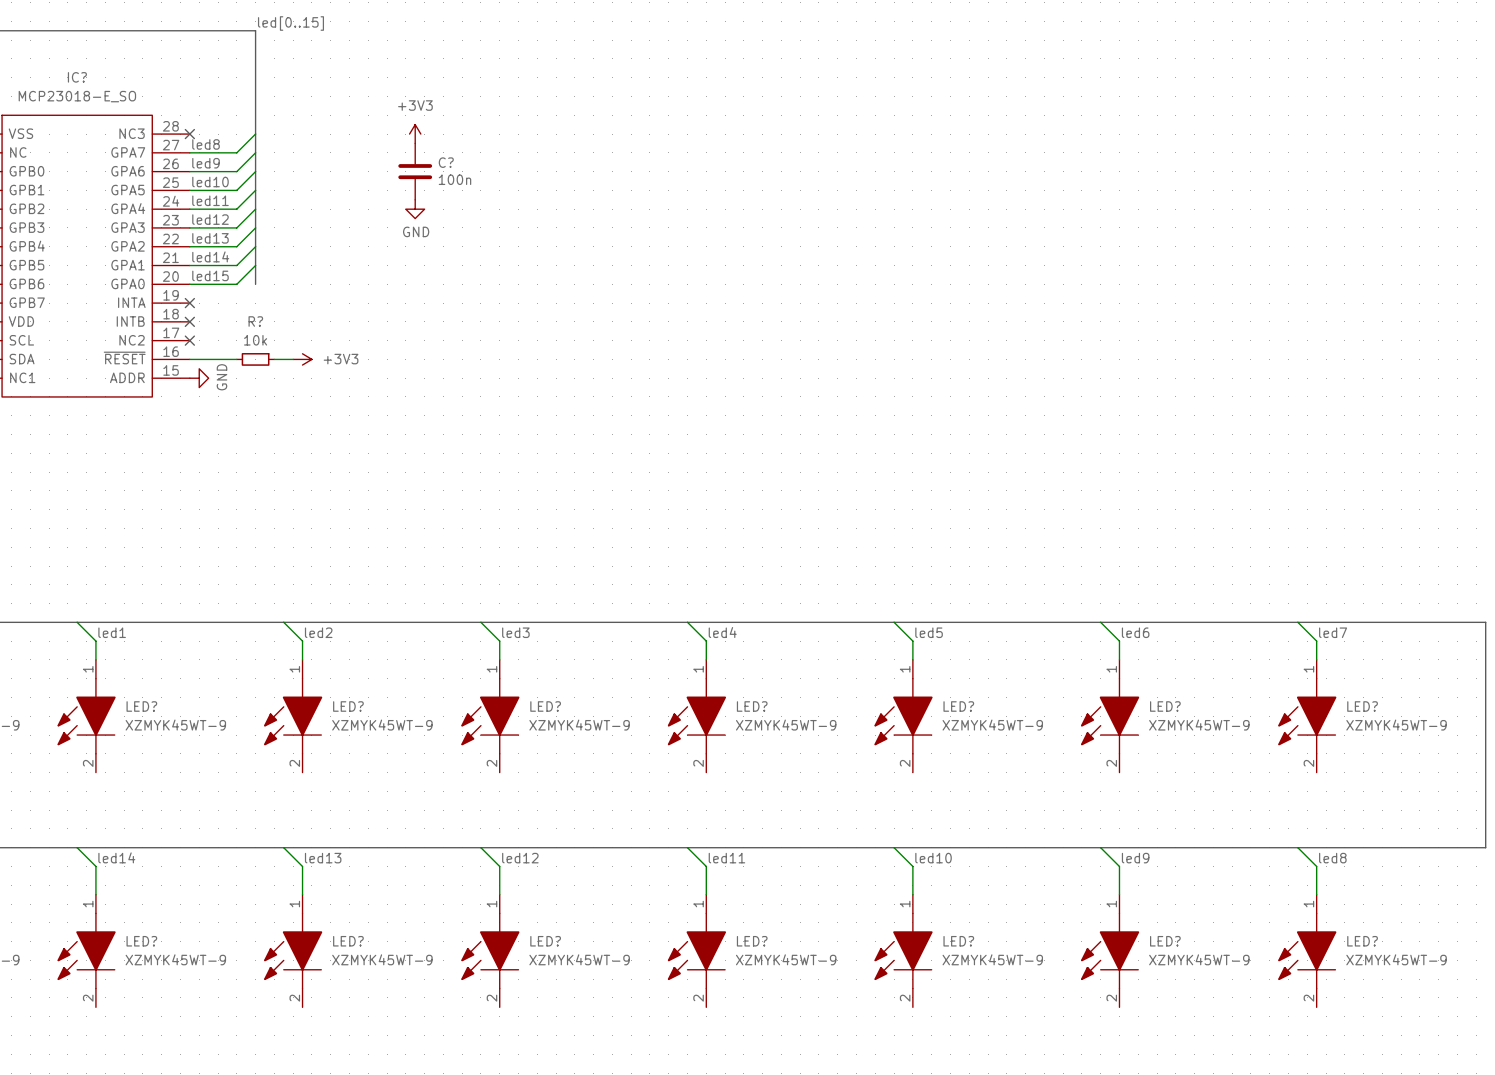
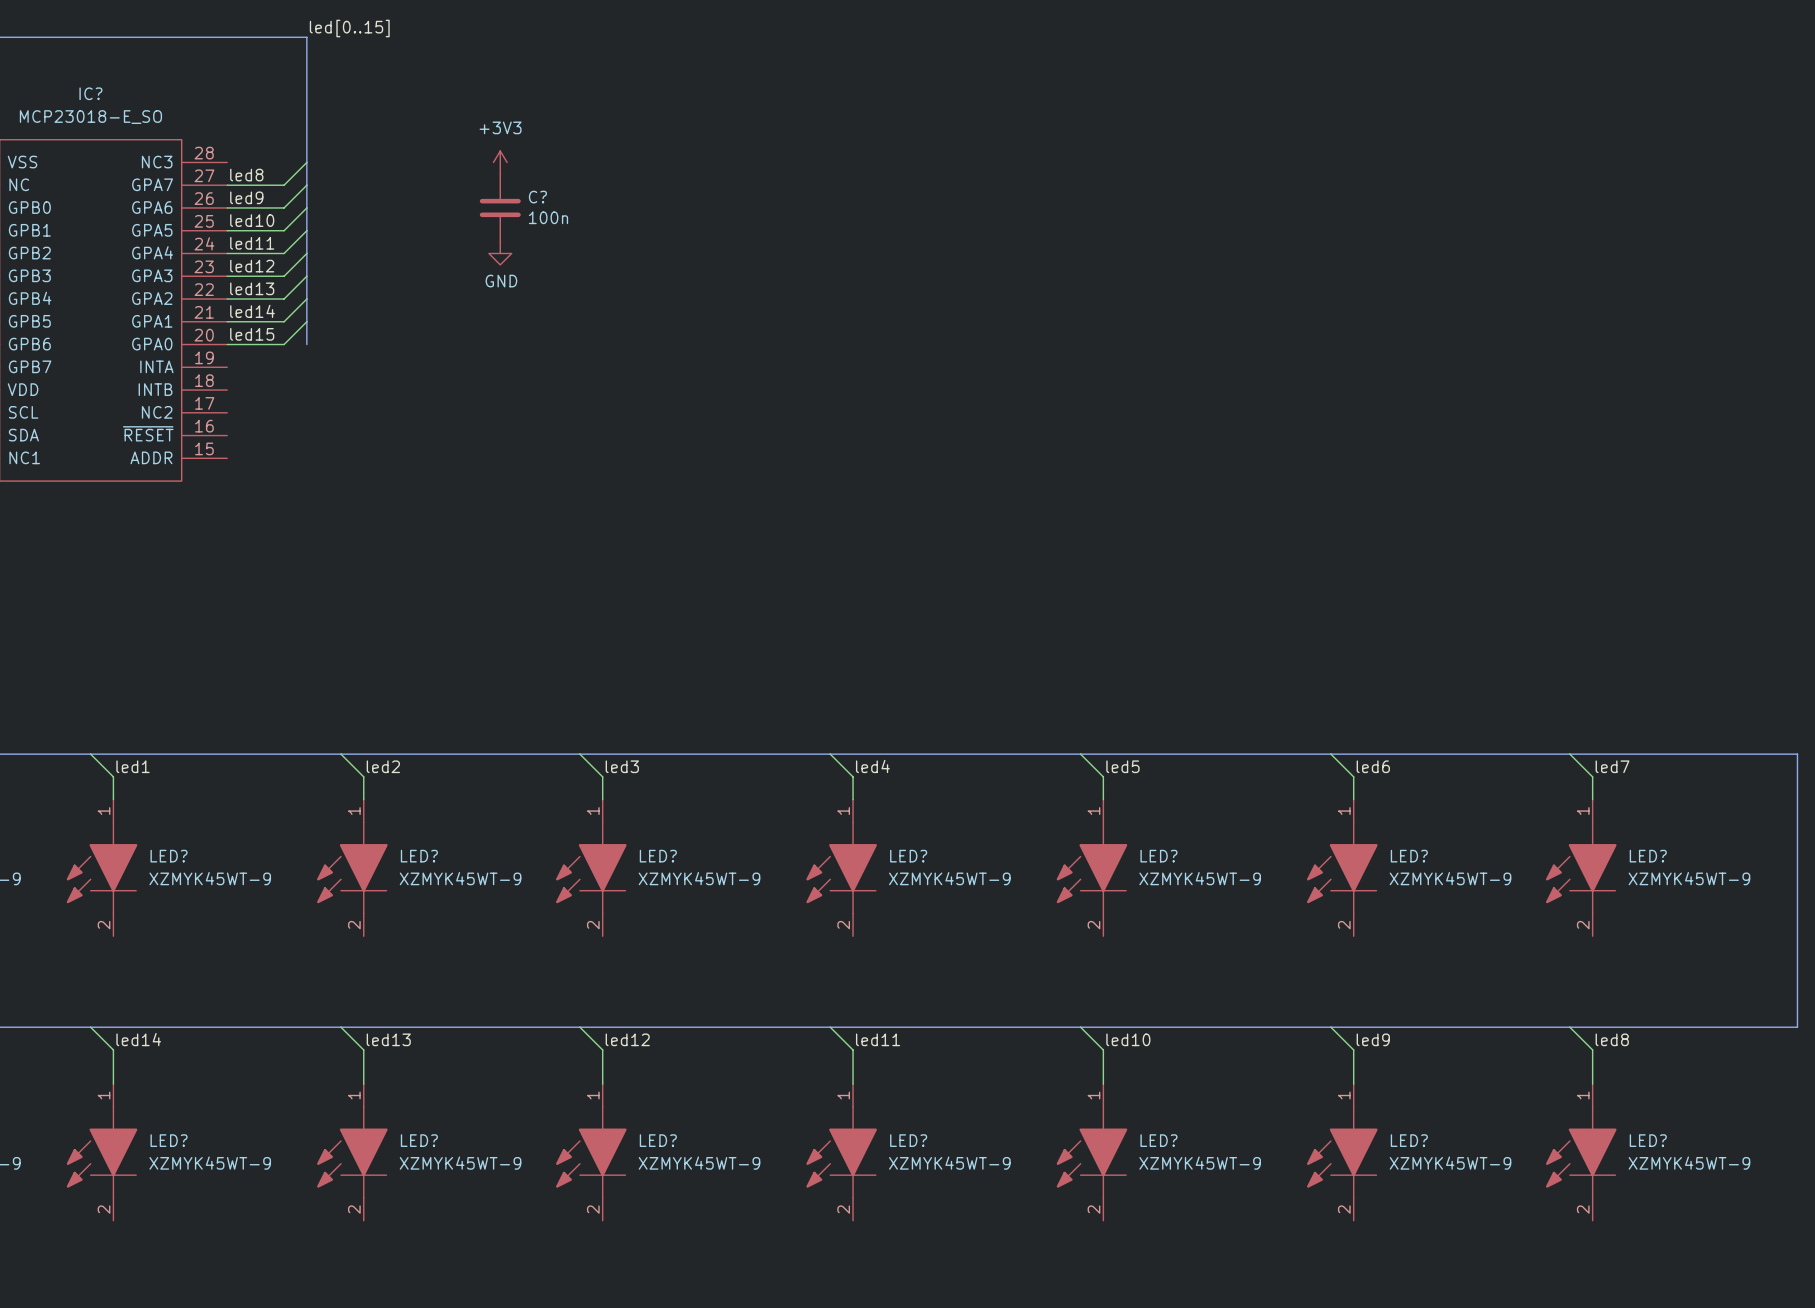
no-connect mark: (189, 134) -> none
no-connect mark: (189, 303) -> none
no-connect mark: (189, 321) -> none
no-connect mark: (189, 340) -> none
wire: (189, 359) (236, 359) -> none
R?: 10k (255, 359) -> none
wire: (274, 359) (293, 359) -> none
power symbol: +3V3 (302, 359) -> none
power symbol: GND (199, 378) -> none

